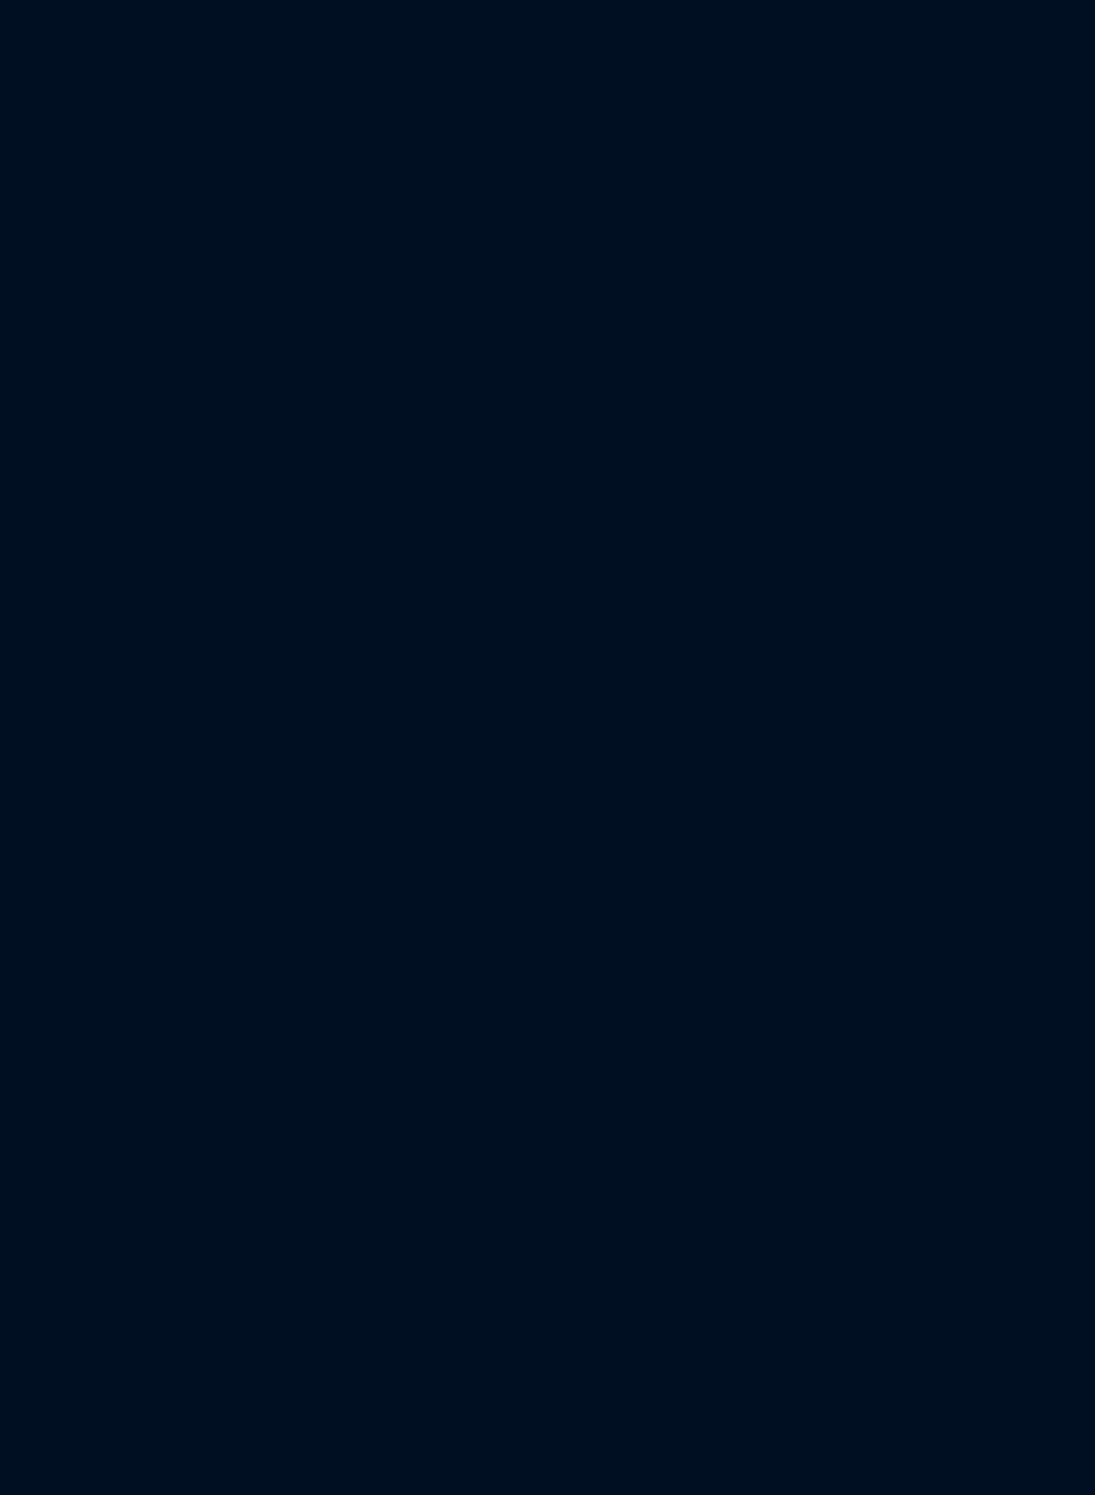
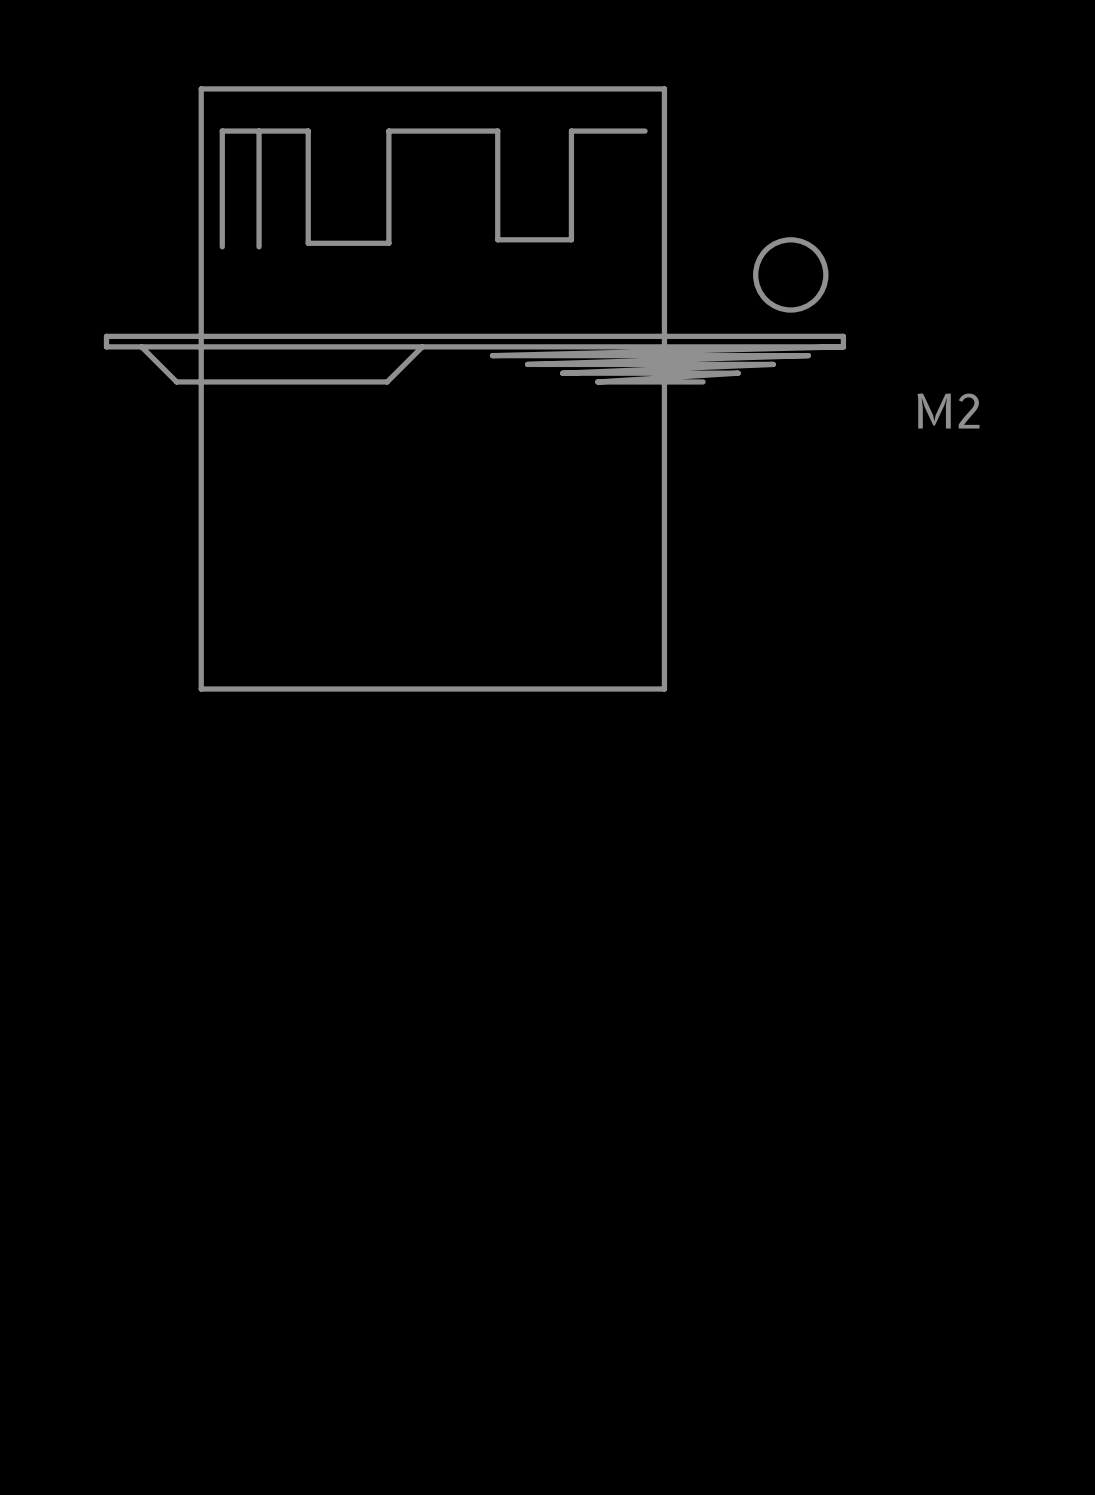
line: none -> (201, 88) (664, 88) (664, 689) (201, 689) (201, 88)
line: none -> (259, 131) (259, 246)
line: none -> (645, 131) (571, 131) (571, 239) (497, 239) (497, 131) (388, 131) (388, 243) (308, 243) (308, 131) (222, 131) (222, 246)
drawing: none -> [753, 237, 829, 313]
line: none -> (141, 346) (176, 381) (387, 381) (422, 346)
line: none -> (843, 346) (106, 346) (106, 336) (843, 336) (843, 346)
line: none -> (843, 346) (492, 355) (808, 355) (527, 364) (773, 364) (562, 373) (738, 373) (597, 381) (703, 381)
text: none -> M2 (948, 411)

